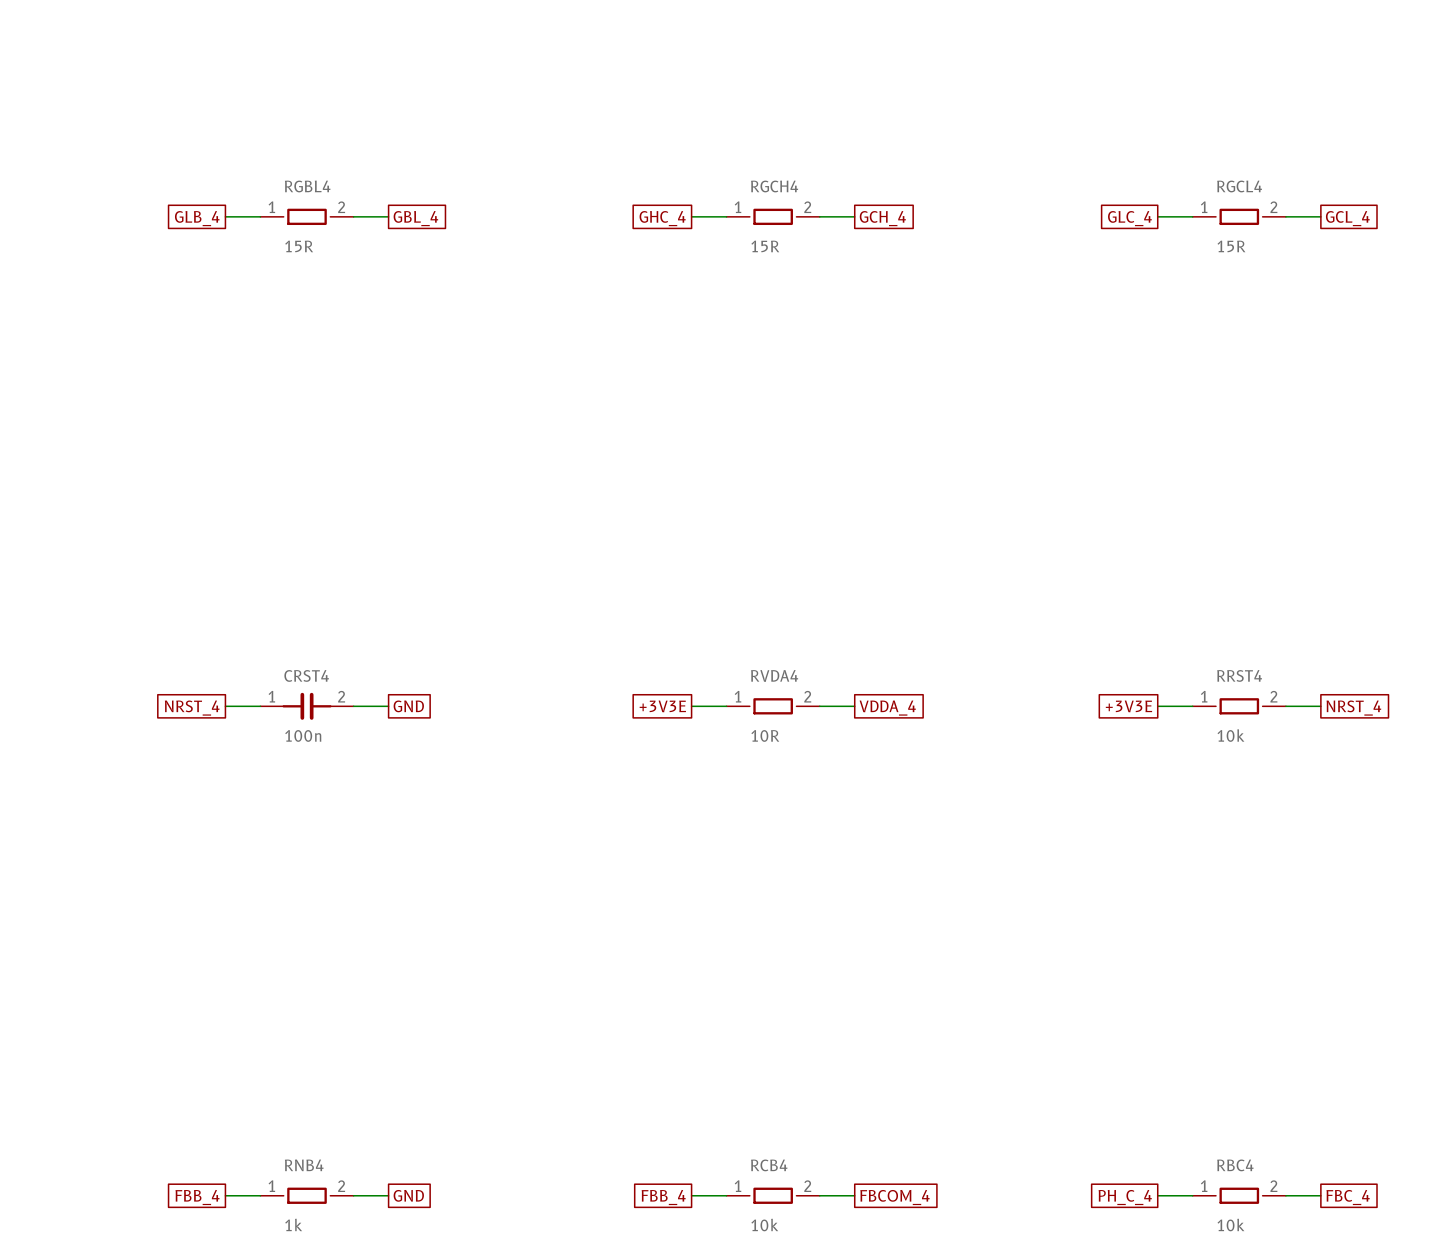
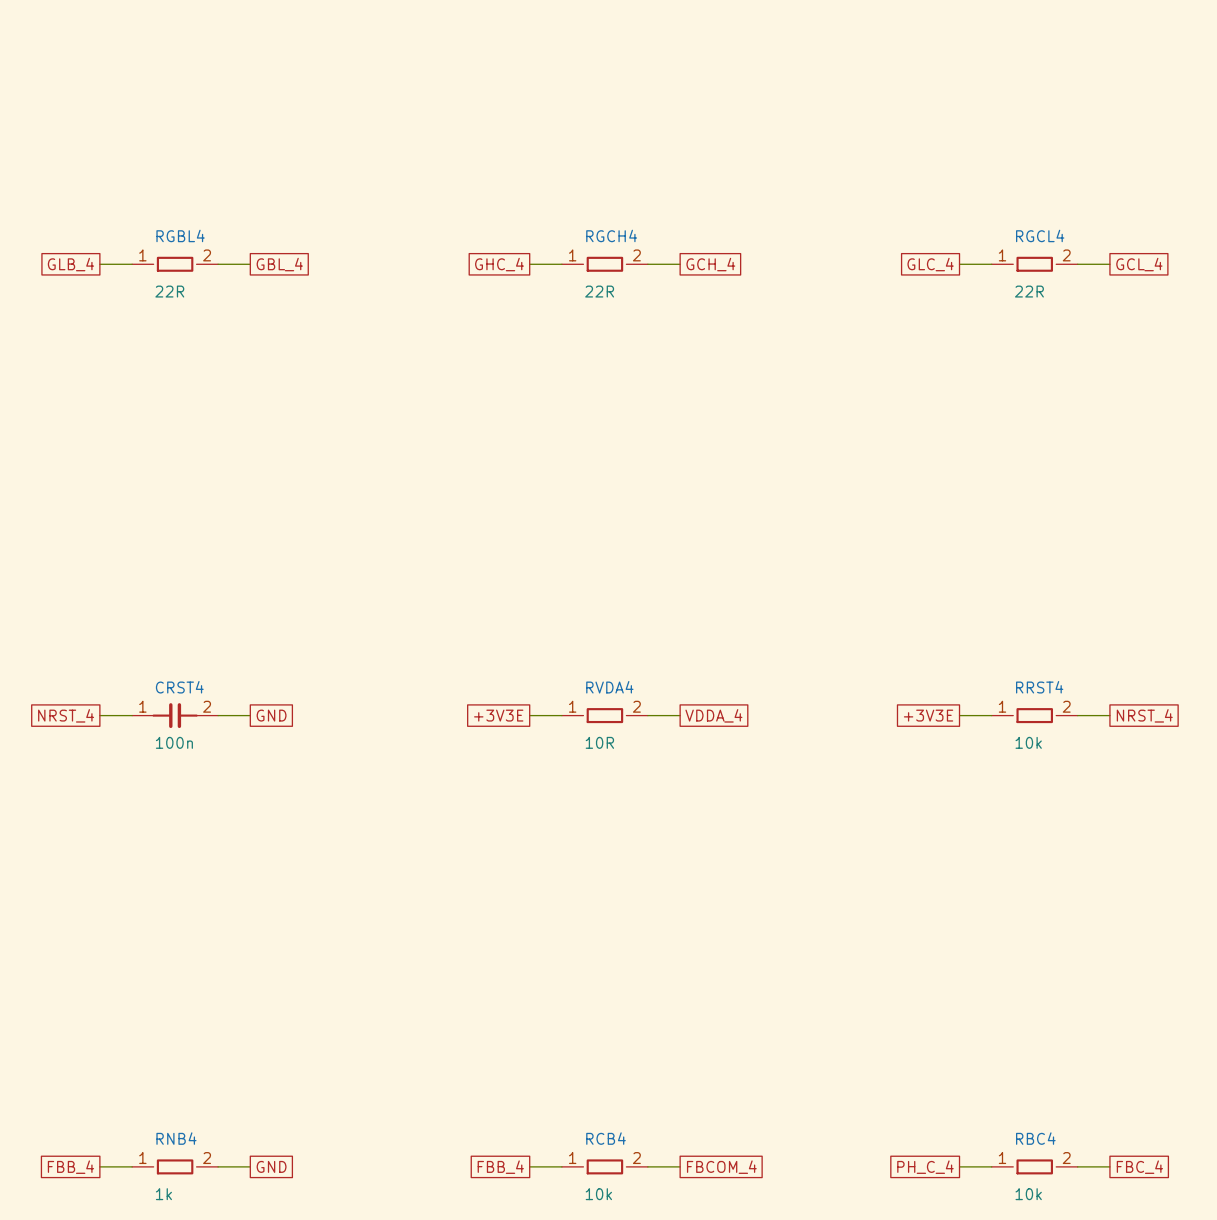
RGBL4 value: 15R (299, 246) -> 22R (169, 291)
RGCH4 value: 15R (765, 246) -> 22R (599, 291)
RGCL4 value: 15R (1231, 246) -> 22R (1029, 291)

